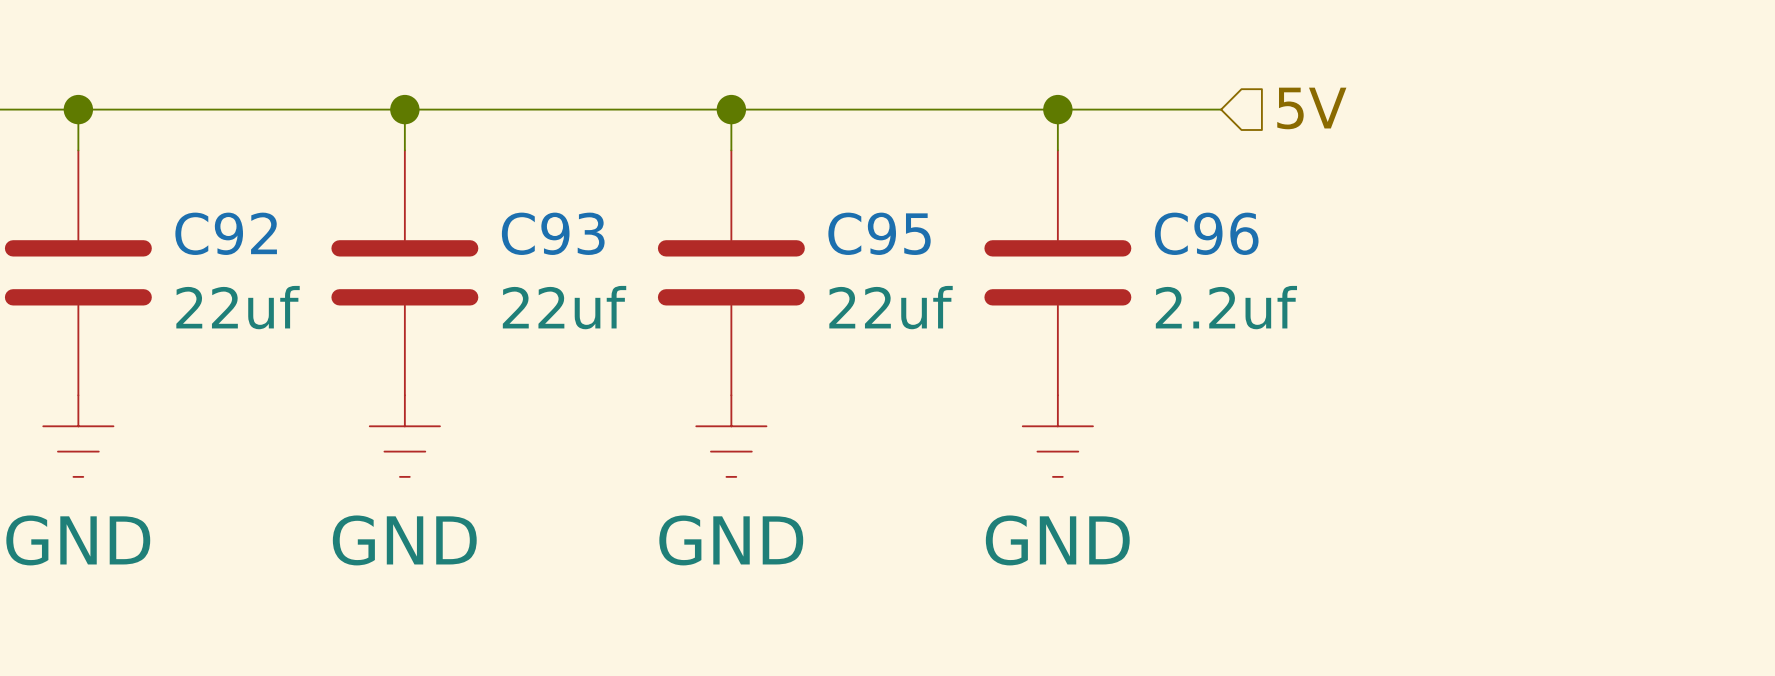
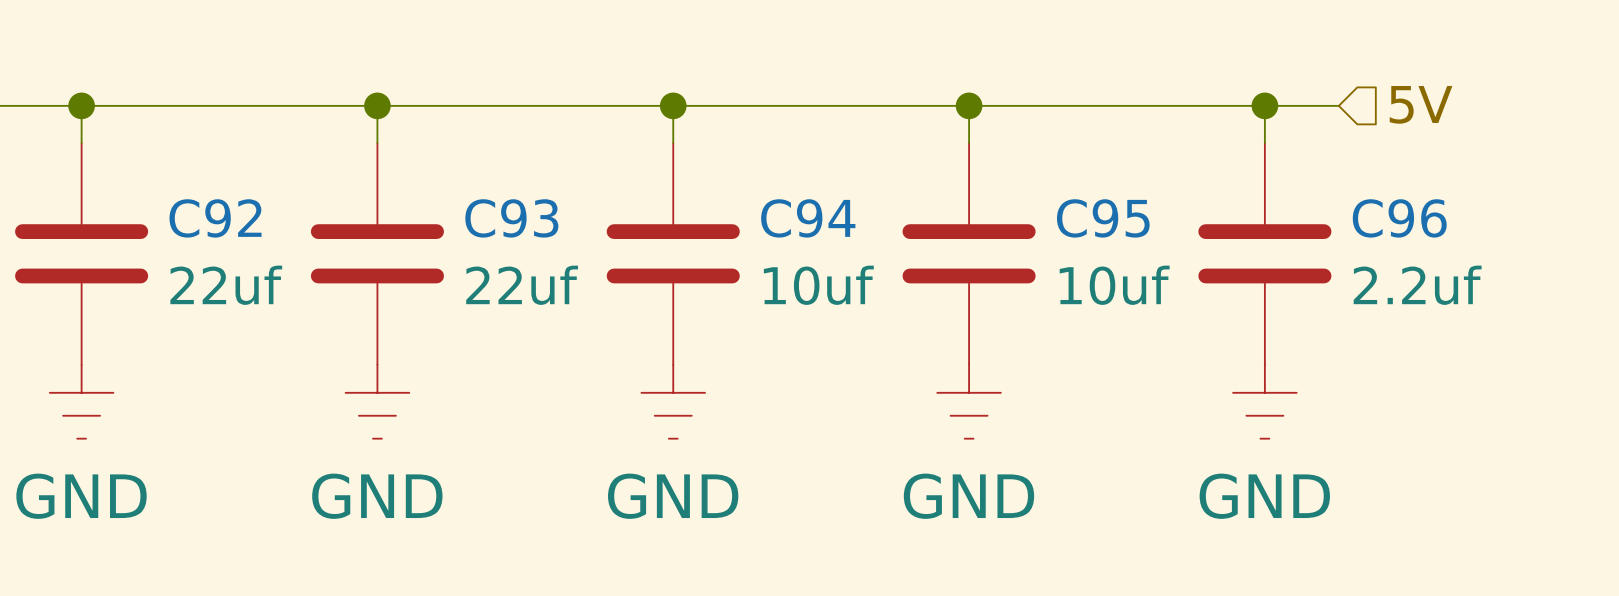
hierarchical label position: 5V (1311, 108) -> 5V (1421, 104)
wire: none -> (1116, 105) (1338, 105)
wire: none -> (1264, 105) (1264, 142)
junction: none -> (1264, 105)
C95 name: C95 (879, 233) -> C94 (808, 218)
C96 name: C96 (1206, 233) -> C95 (1103, 218)
C96: none -> 2.2uf (1264, 253)
C95 value: 22uf (891, 307) -> 10uf (818, 285)
C96 value: 2.2uf (1226, 307) -> 10uf (1114, 285)
power symbol: none -> GND (1264, 401)

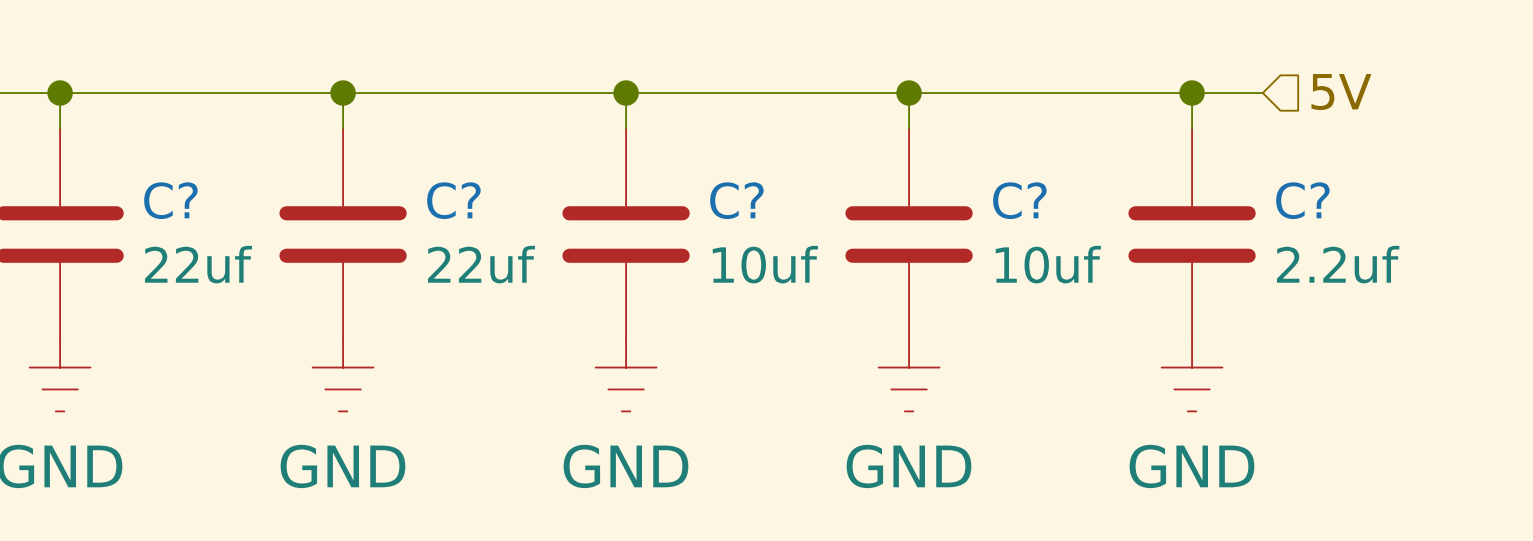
C92 name: C92 (215, 218) -> C? (170, 200)
C93 name: C93 (511, 218) -> C? (453, 200)
C94 name: C94 (808, 218) -> C? (736, 200)
C95 name: C95 (1103, 218) -> C? (1019, 200)
C96 name: C96 (1399, 218) -> C? (1302, 200)

